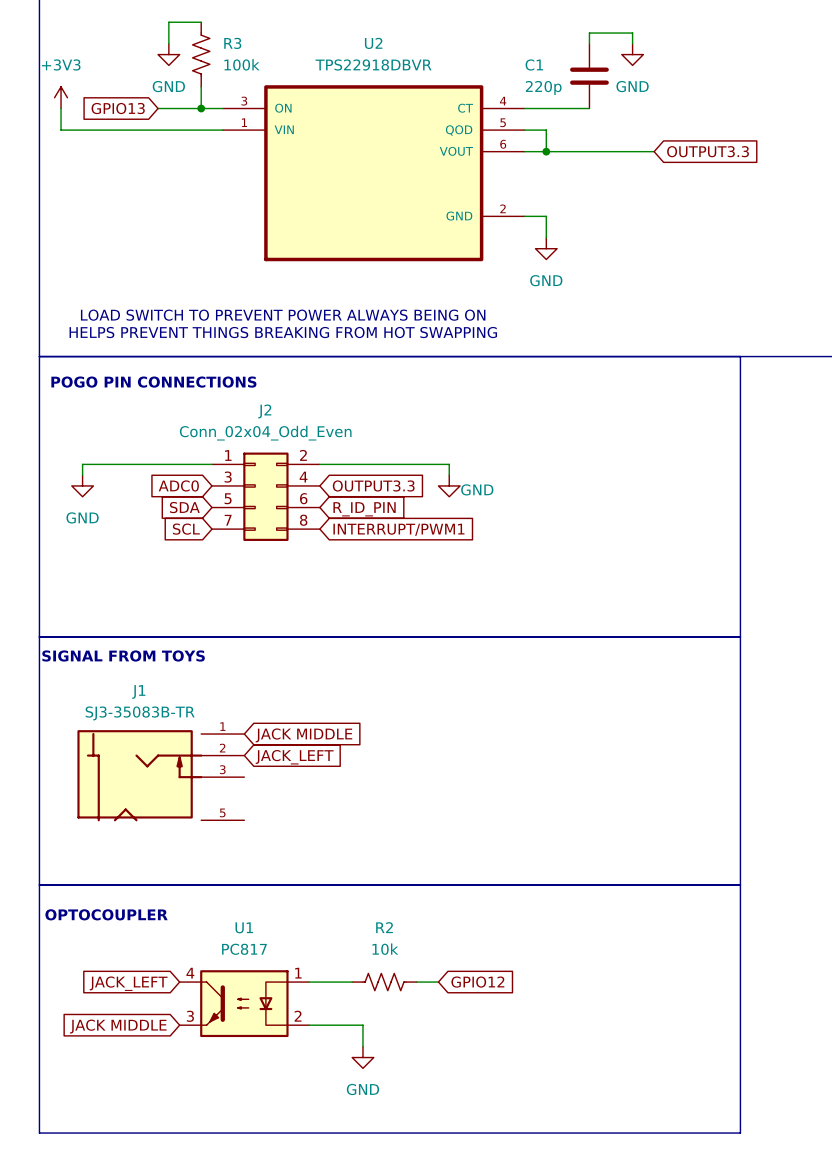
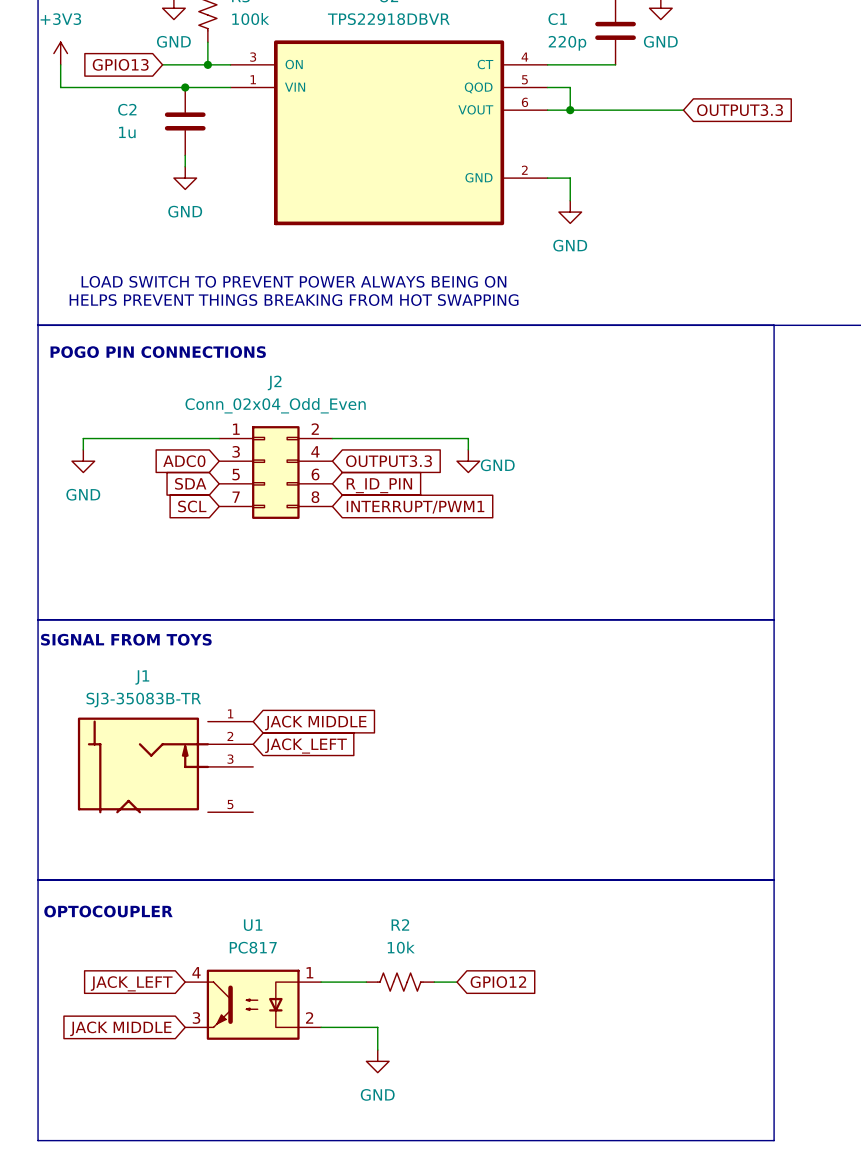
junction: none -> (185, 87)
C2: none -> 1u (185, 121)
wire: none -> (185, 155) (185, 166)
power symbol: none -> GND (185, 178)

